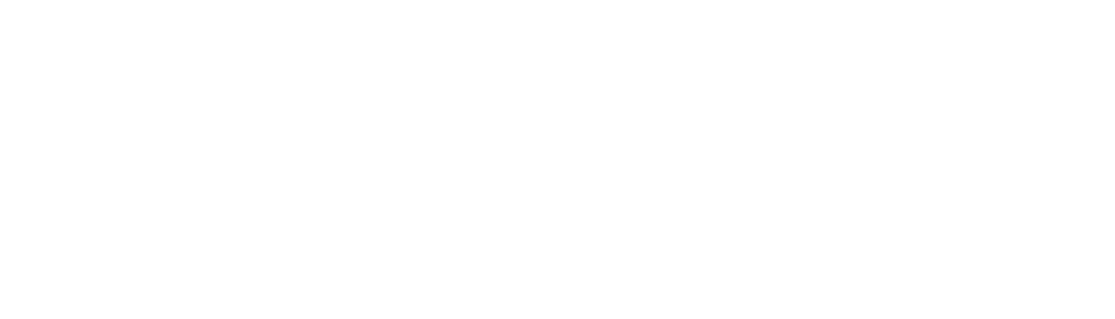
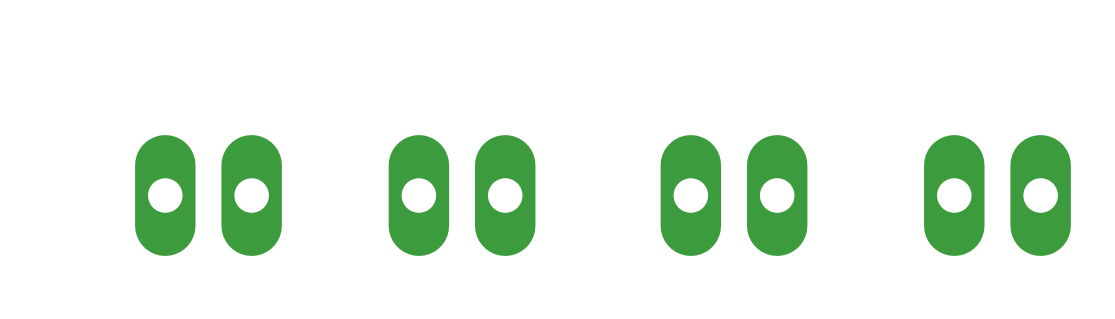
part: none -> (208, 195)
part: none -> (462, 195)
part: none -> (734, 195)
part: none -> (997, 195)

